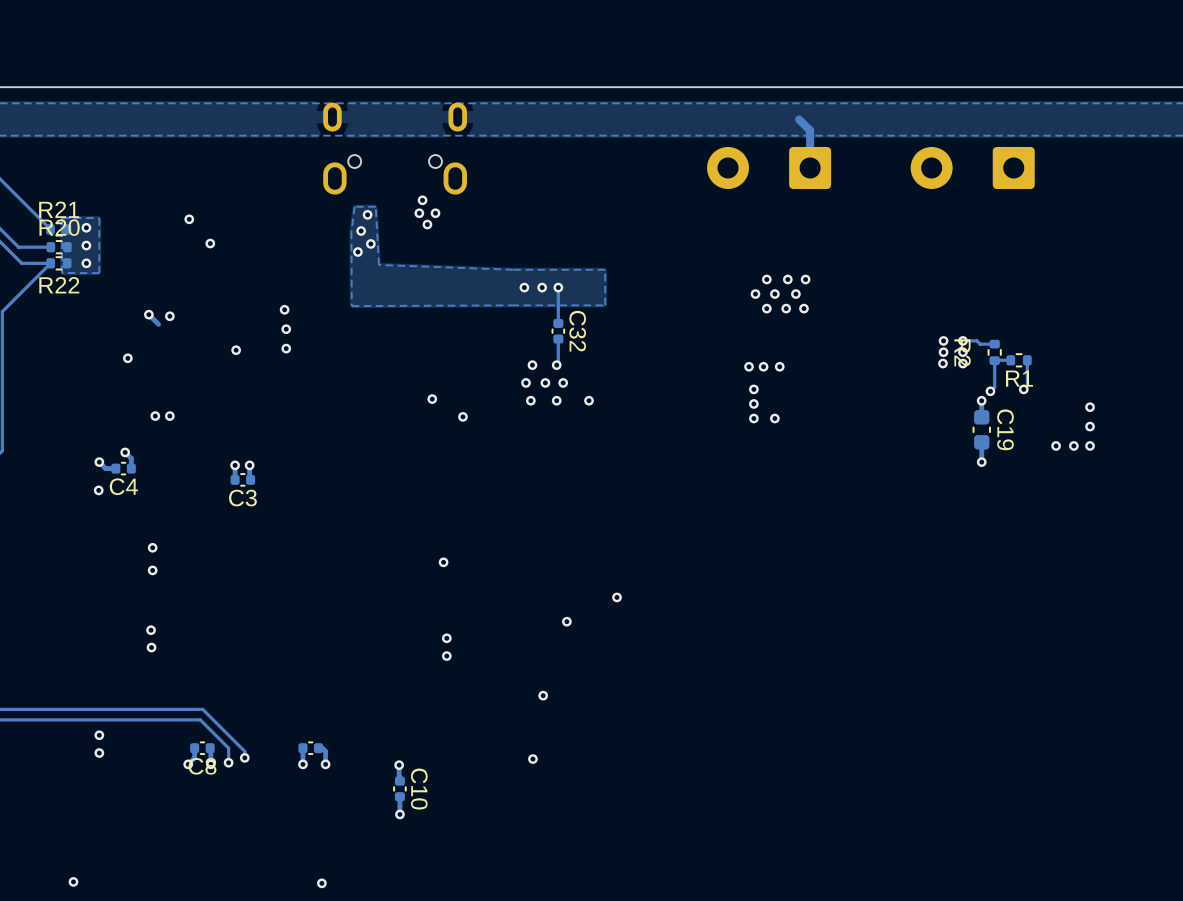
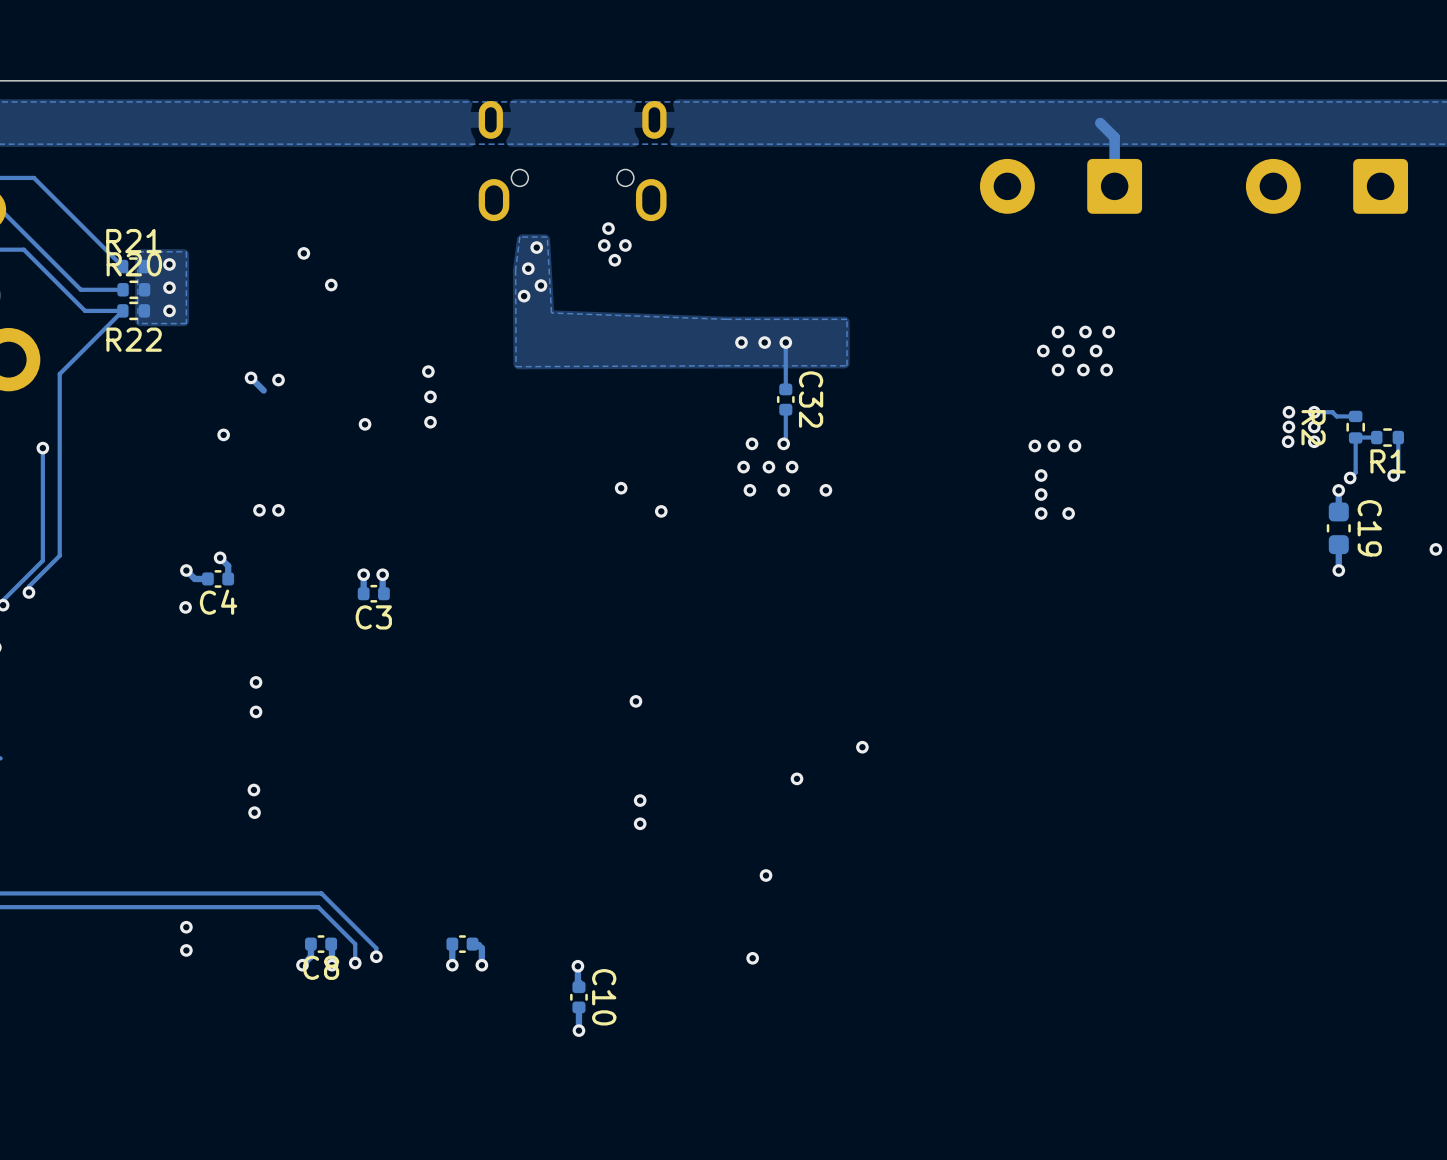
via: (73, 881) -> none
via: (321, 883) -> none

